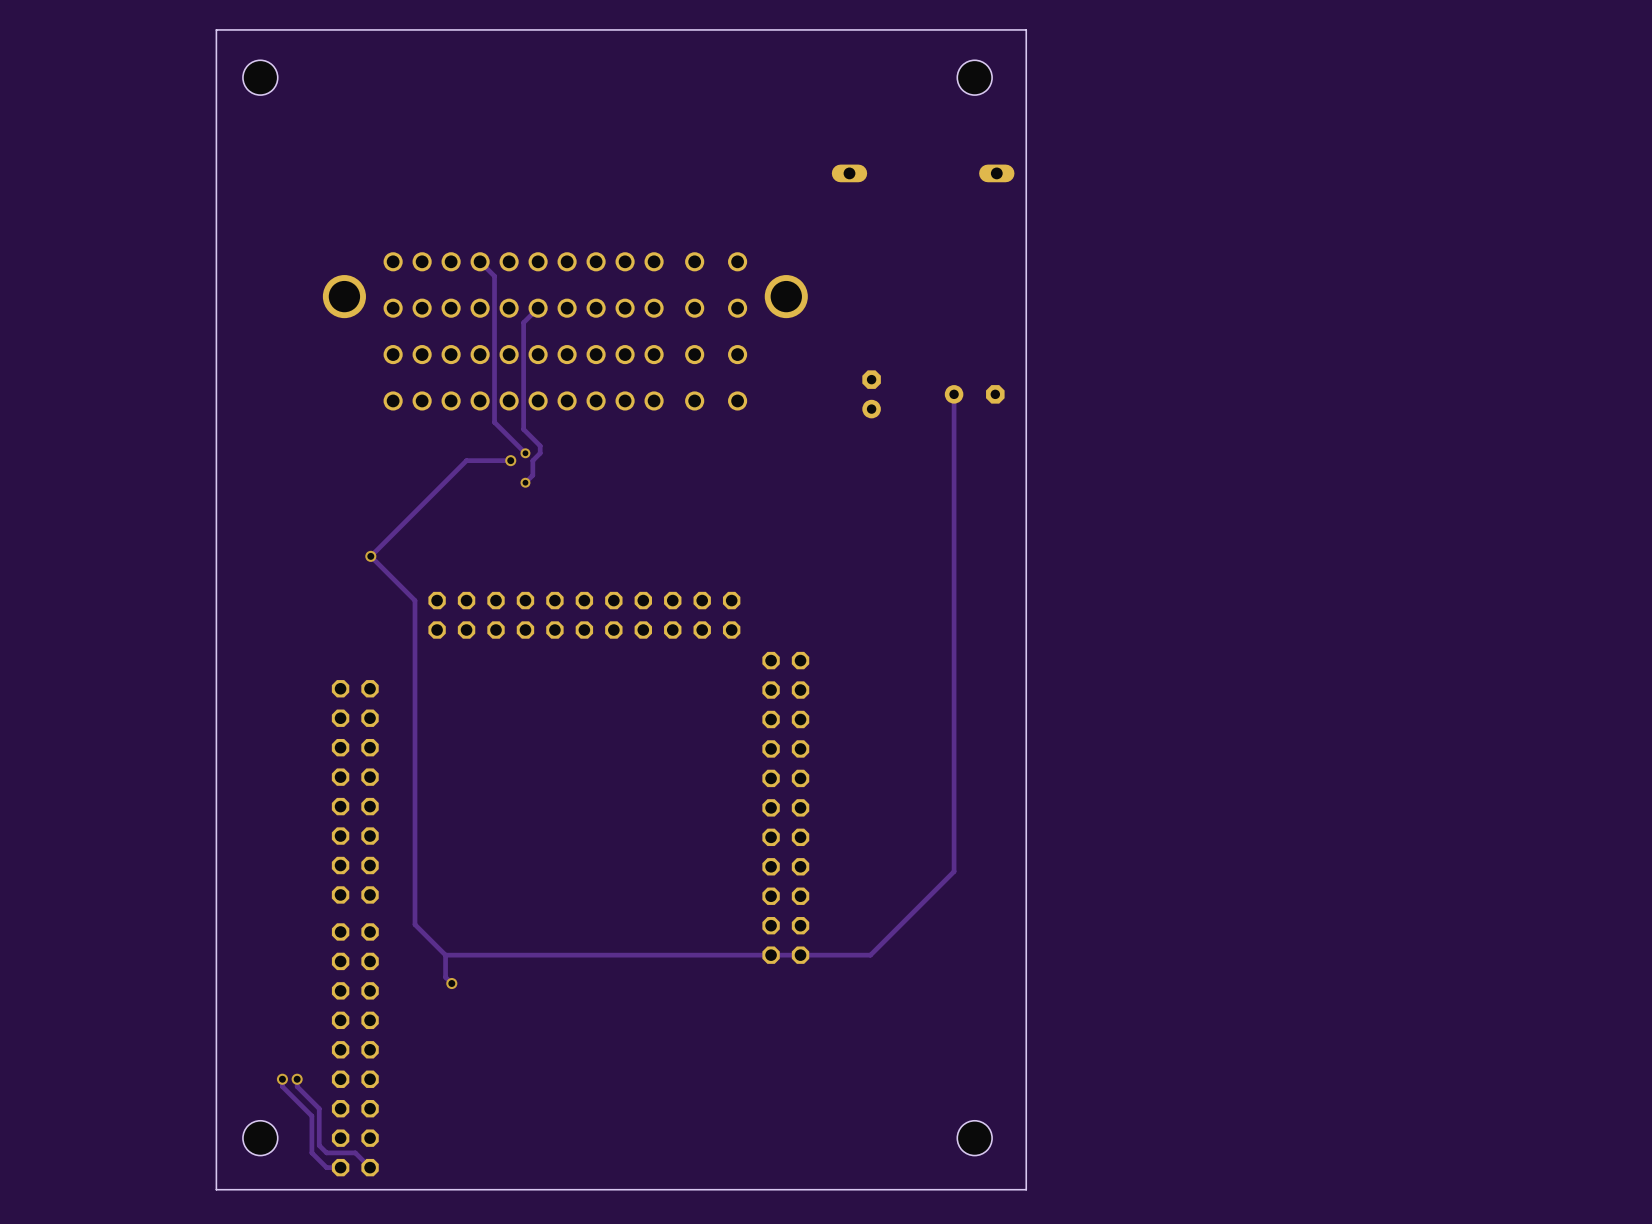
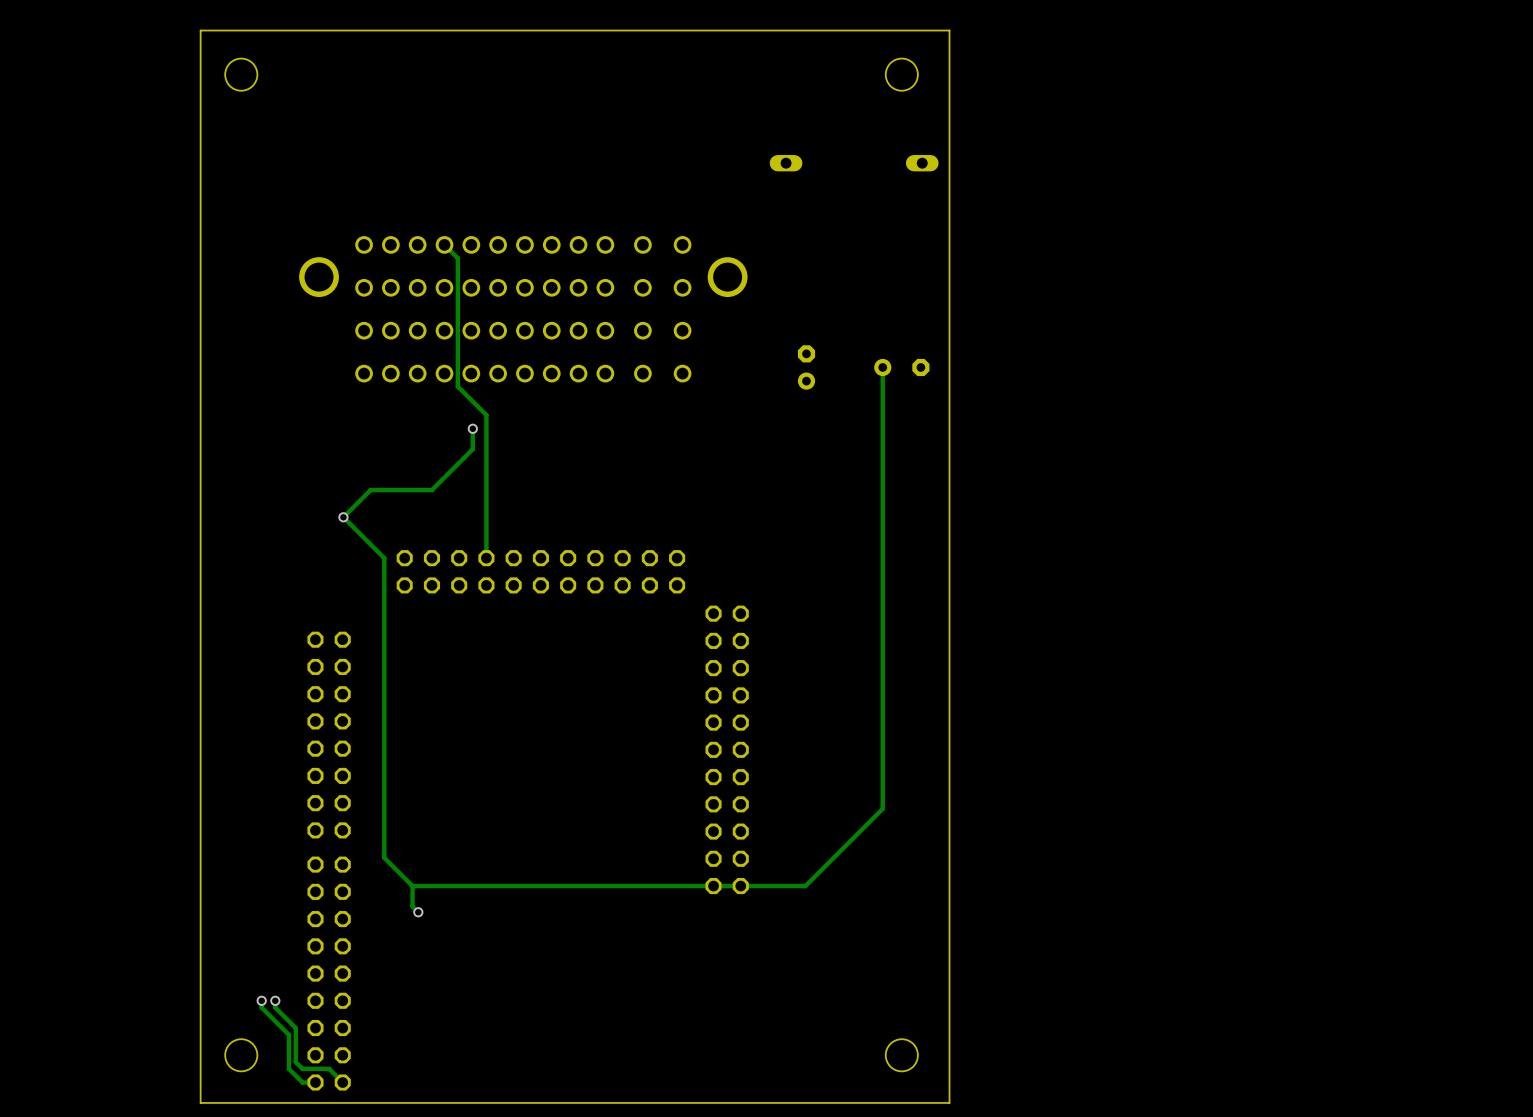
track: (538, 308) (523, 322) (523, 429) (540, 445) (540, 453) (532, 460) (532, 475) (525, 482) -> none
track: (494, 414) (494, 422) (525, 453) -> (457, 386) (486, 415) (486, 558)
via: (525, 453) -> none
track: (510, 460) (466, 460) (400, 526) -> (472, 428) (472, 449) (431, 490) (370, 490)
via: (525, 482) -> none

